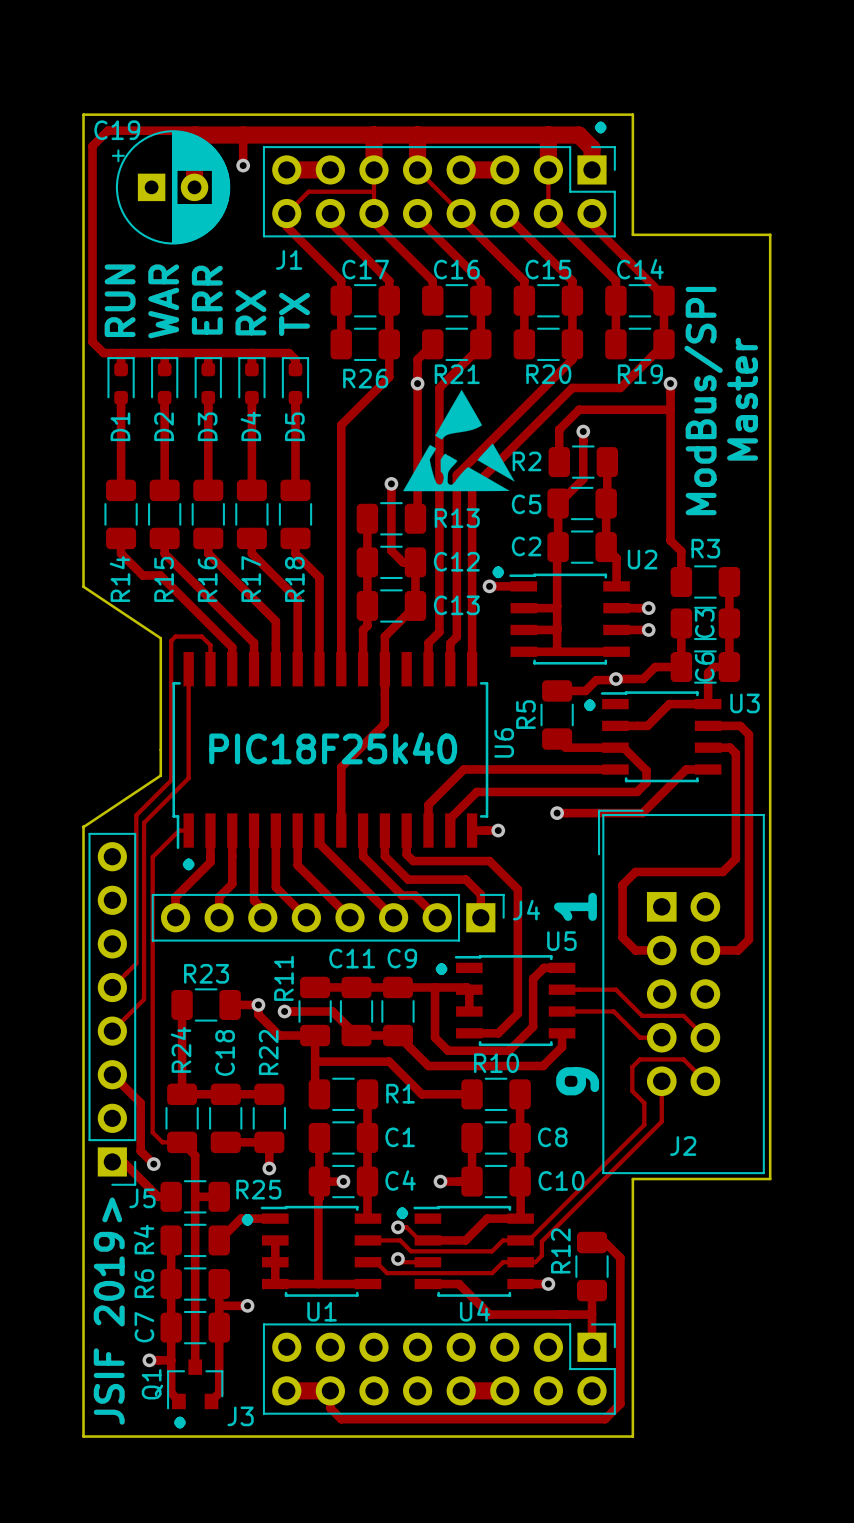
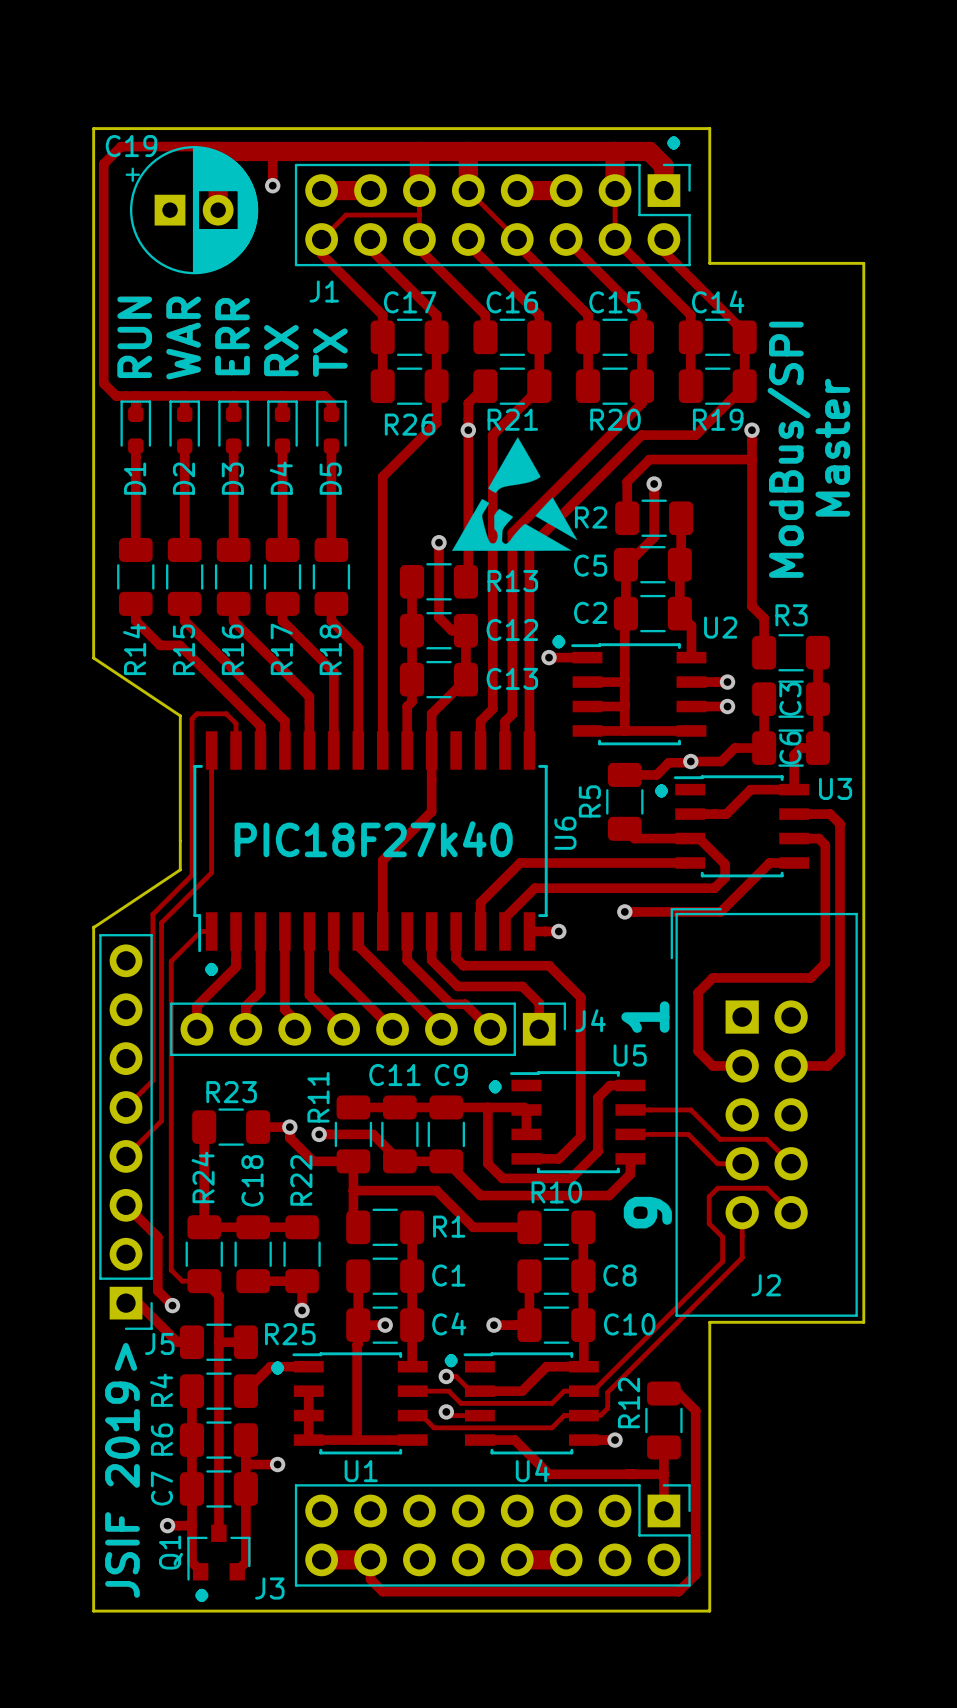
text: PIC18F25k40 (333, 748) -> PIC18F27k40 (373, 839)

